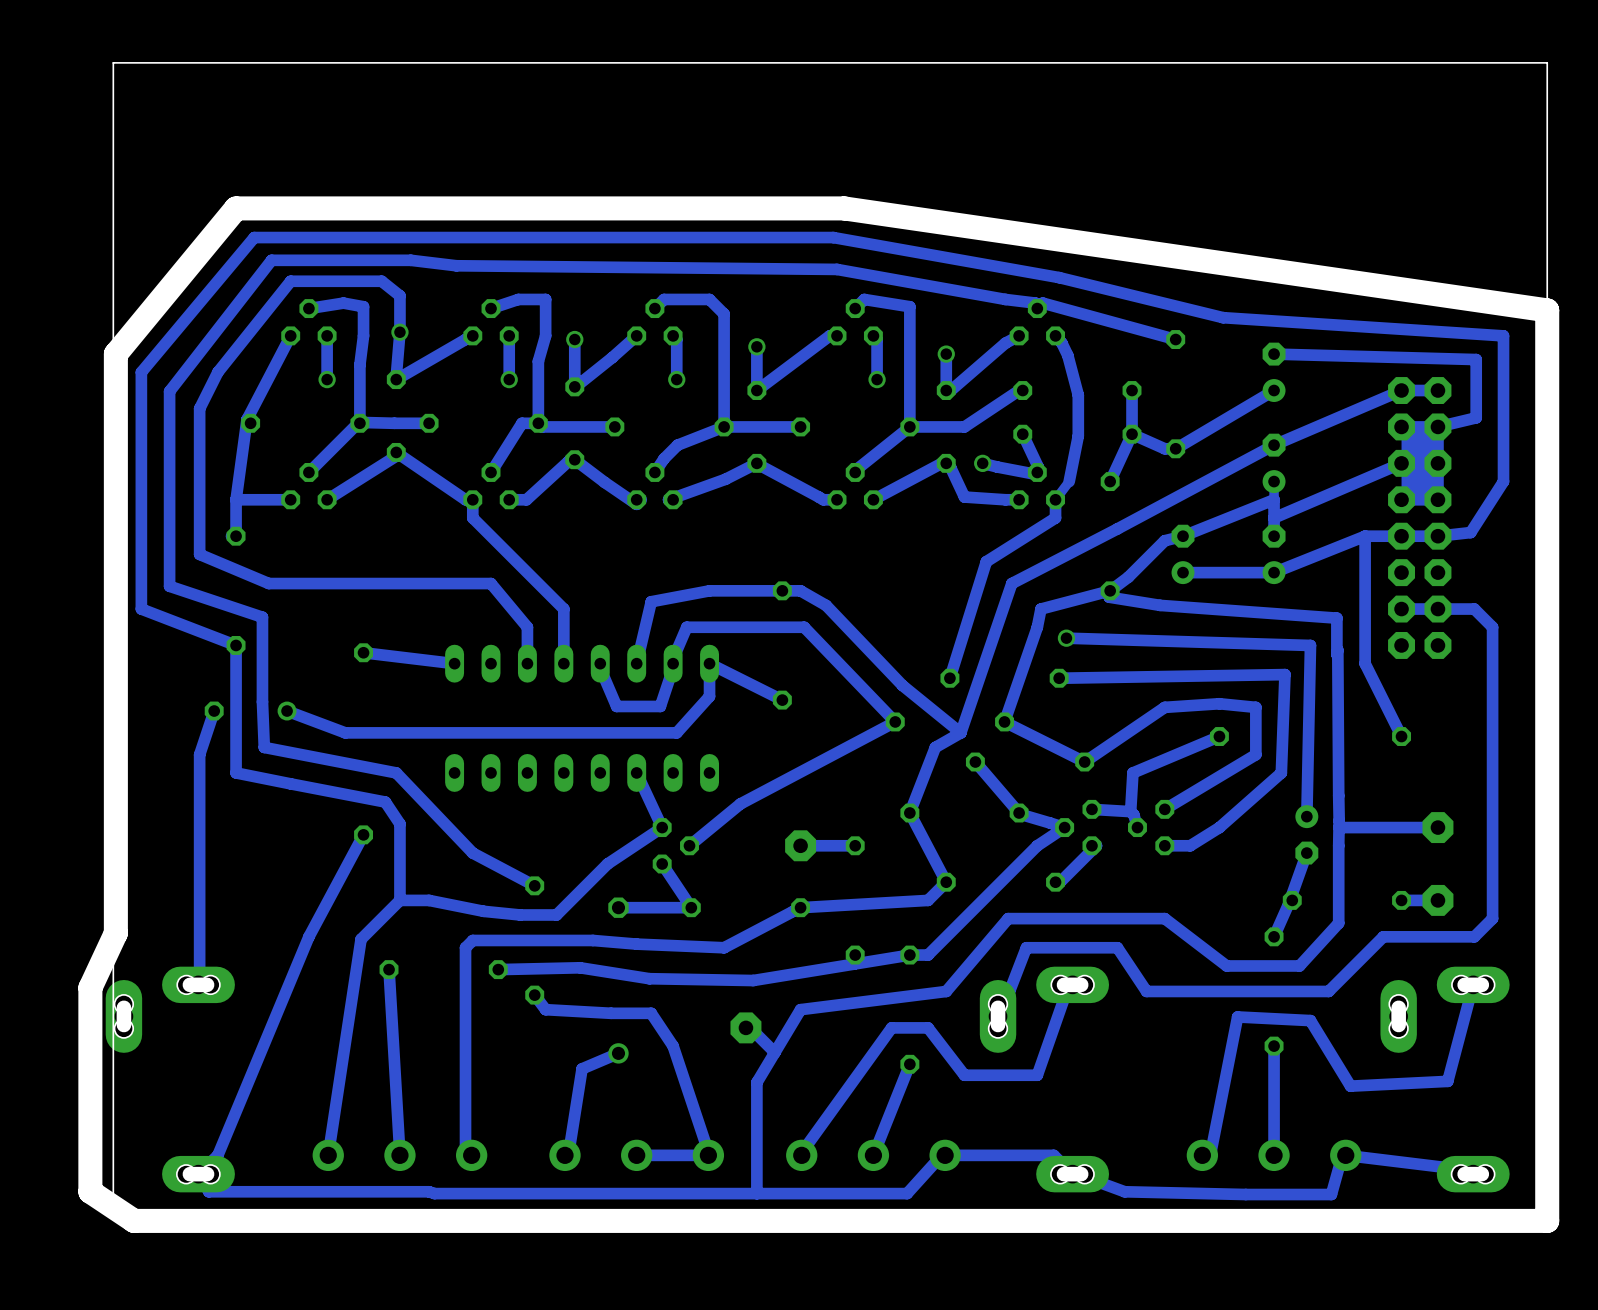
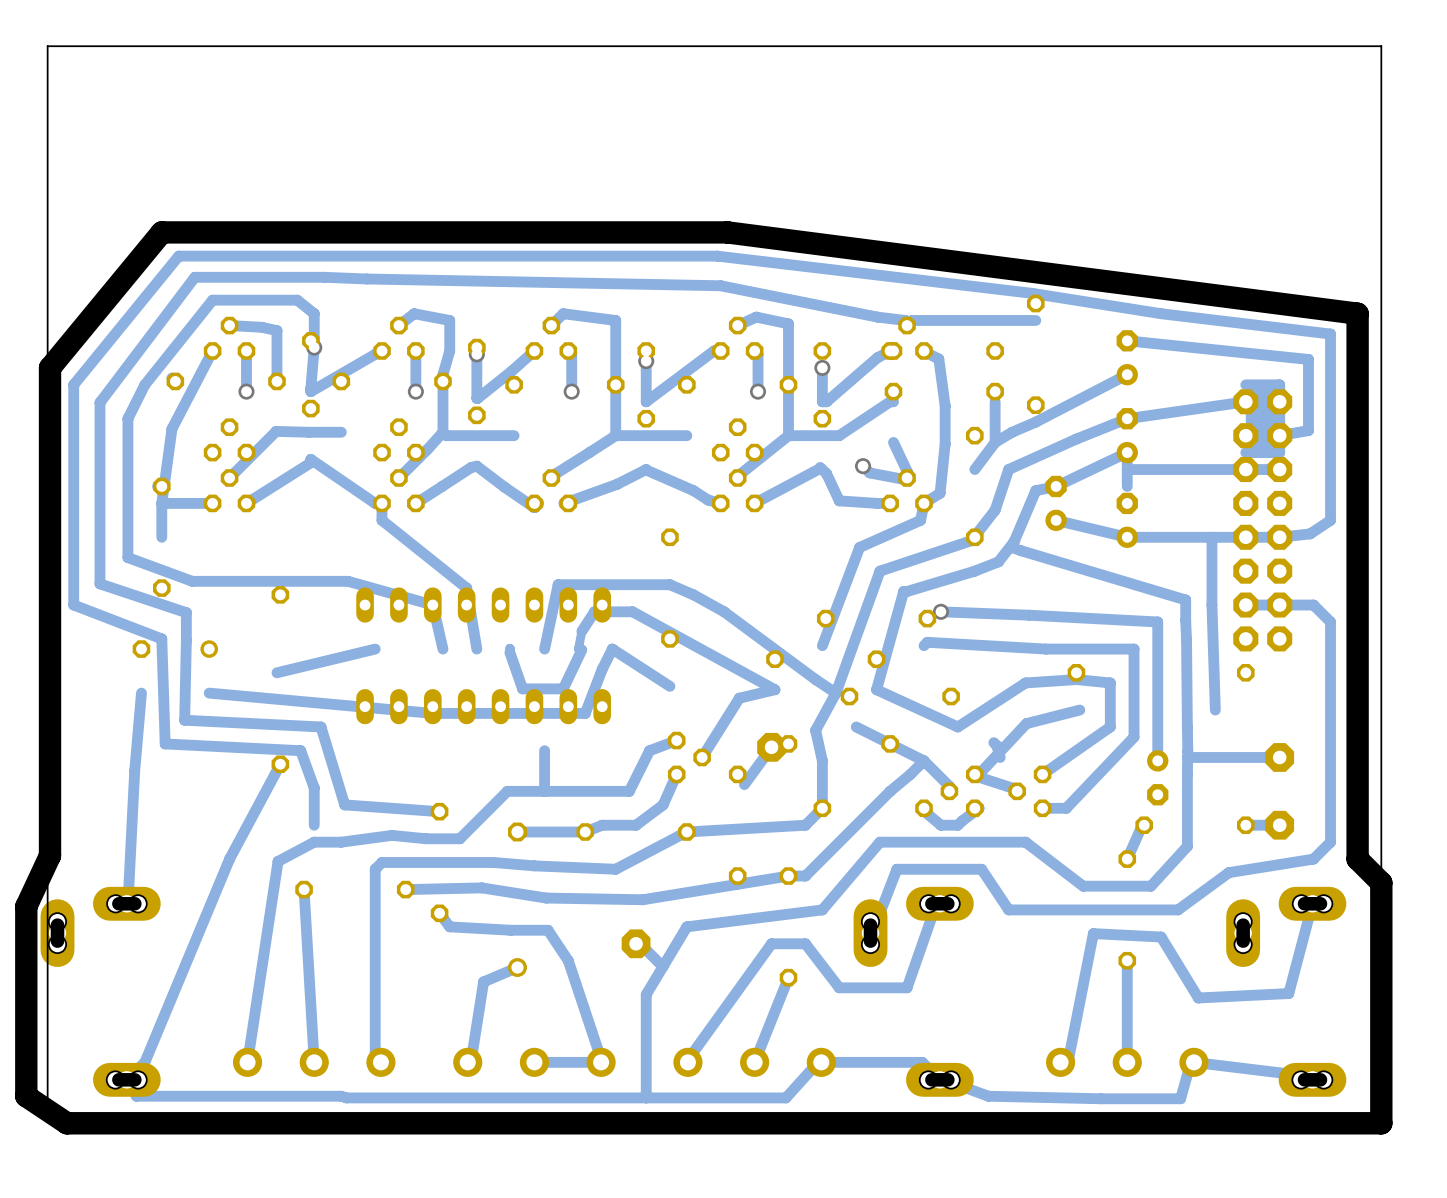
track: (308, 308) (343, 303) (363, 306) (363, 335) (359, 368) -> (229, 325) (261, 327) (276, 330)
track: (491, 308) (518, 299) (545, 299) (545, 335) (538, 361) (538, 416) -> (398, 325) (414, 313) (449, 320) (449, 350) (442, 374)
track: (654, 308) (664, 299) (709, 299) (724, 314) (724, 357) -> (551, 325) (563, 313) (615, 320)
track: (855, 308) (864, 299) (909, 306) (909, 361) -> (737, 325) (756, 317) (788, 323)
part position: (308, 322) -> (229, 338)
part position: (491, 322) -> (398, 338)
part: (654, 322) -> none
part position: (855, 322) -> (737, 338)
part: (1037, 322) -> none
via: (399, 332) -> none
track: (290, 335) (246, 419) (236, 499) -> (212, 350) (171, 428) (161, 503)
track: (327, 335) (327, 379) -> (246, 350) (246, 391)
track: (472, 335) (396, 379) (399, 332) (399, 295) (381, 281) (290, 281) (217, 372) (199, 408) (199, 463) -> (381, 350) (310, 391) (314, 313) (297, 300) (212, 300) (144, 384) (127, 418)
track: (509, 335) (509, 379) -> (415, 350) (415, 391)
track: (636, 335) (575, 386) (574, 339) -> (534, 350) (477, 398) (476, 354)
track: (673, 335) (676, 339) (676, 379) -> (568, 350) (571, 354) (571, 391)
track: (837, 335) (829, 335) (756, 390) (756, 346) -> (720, 350) (713, 350) (646, 401) (646, 361)
track: (873, 335) (877, 339) (877, 379) -> (754, 350) (758, 354) (758, 391)
track: (1019, 335) (1005, 343) (950, 390) (946, 390) (946, 354) -> (890, 350) (877, 357) (826, 401) (822, 401) (822, 367)
track: (1055, 335) (1061, 343) (1067, 355) (1078, 395) (1078, 436) (1069, 481) (1055, 499) (1055, 517) (986, 561) (949, 678) -> none
via: (574, 339) -> none
track: (1175, 339) (1042, 303) (1037, 308) (1035, 303) (837, 269) (456, 265) (410, 260) (271, 260) (169, 391) (169, 446) -> (1035, 320) (912, 320) (907, 325) (905, 320) (877, 317) (720, 285) (324, 277) (194, 277) (99, 402)
via: (756, 346) -> none
via: (946, 354) -> none
track: (1274, 354) (1476, 359) (1476, 417) (1437, 426) -> none
part position: (1274, 372) -> (1127, 357)
part: none -> (551, 338)
part: none -> (907, 338)
via: (327, 379) -> none
via: (509, 379) -> none
via: (676, 379) -> none
via: (877, 379) -> none
track: none -> (1127, 340) (1308, 359) (1308, 430) (1279, 435) (1245, 435)
via: none -> (314, 347)
track: (1022, 390) (1019, 390) (964, 426) (909, 426) (855, 472) -> none
track: none -> (924, 350) (938, 359) (945, 406) (945, 444) (940, 493) (924, 503) (920, 520) (859, 547) (822, 645)
track: (1132, 390) (1132, 434) -> (995, 401) (995, 442)
track: (1274, 390) (1175, 448) (1164, 448) (1132, 434) -> none
track: (1437, 390) (1401, 390) (1274, 445) (1011, 583) (960, 732) -> none
via: none -> (476, 354)
via: none -> (646, 361)
board edge: (115, 408) (115, 354) (236, 208) (844, 208) (1547, 310) (1547, 962) -> (50, 367) (161, 232) (727, 232) (1357, 313) (1357, 859) (1381, 882)
via: none -> (822, 367)
track: none -> (1127, 374) (995, 442)
track: (429, 423) (358, 422) (308, 472) -> (341, 432) (276, 431) (229, 478)
track: none -> (442, 381) (442, 432)
track: (141, 426) (141, 372) (254, 237) (833, 237) (1059, 277) (1223, 317) (1503, 335) (1503, 481) (1470, 532) (1437, 536) (1365, 536) -> (73, 384) (178, 256) (717, 256) (1032, 293) (1161, 313) (1330, 334) (1330, 520) (1310, 533) (1279, 537) (1127, 537) (1056, 520)
track: (614, 426) (542, 426) (538, 423) (521, 423) (491, 472) -> none
track: none -> (615, 384) (615, 435)
track: (800, 426) (724, 426) (677, 445) (664, 458) (654, 472) -> none
track: none -> (788, 384) (788, 435)
via: none -> (246, 391)
via: none -> (415, 391)
via: none -> (571, 391)
via: none -> (758, 391)
track: (1022, 434) (1038, 467) (1037, 474) -> (893, 442) (907, 472) (907, 480)
track: (1132, 434) (1110, 481) -> none
track: none -> (893, 401) (890, 401) (839, 435) (788, 435)
track: none -> (1279, 401) (1245, 401) (1127, 418) (1008, 469) (995, 510) (971, 540) (879, 571) (835, 693)
track: (982, 463) (1037, 474) -> none
via: (982, 463) -> none
part position: (1274, 463) -> (1127, 435)
track: (1437, 463) (1401, 463) (1274, 517) -> (1279, 469) (1127, 469)
track: (950, 467) (964, 497) (1019, 499) -> (826, 473) (839, 500) (890, 503)
track: (950, 467) (943, 461) (873, 499) -> (826, 473) (820, 467) (754, 503)
track: none -> (442, 432) (446, 435) (514, 435)
track: none -> (442, 432) (398, 478)
track: none -> (615, 435) (551, 478)
track: none -> (686, 435) (615, 435)
track: none -> (788, 435) (737, 478)
track: (1274, 481) (1274, 499) (1183, 536) (1164, 540) (1128, 577) (1110, 590) -> none
part: (654, 486) -> none
part: (1037, 486) -> none
track: none -> (995, 442) (974, 469)
track: (236, 499) (236, 536) -> (161, 503) (161, 537)
track: (290, 499) (236, 499) -> (212, 503) (161, 503)
track: (327, 499) (396, 456) (396, 452) (465, 499) (472, 499) (472, 517) (563, 609) (563, 663) -> none
track: (636, 499) (641, 499) (636, 504) (574, 459) (568, 461) (526, 499) (509, 499) -> none
track: (837, 499) (823, 499) (756, 463) (725, 479) (668, 499) (673, 499) -> none
track: none -> (1127, 452) (1056, 486) (1035, 490) (1014, 541)
track: none -> (863, 466) (869, 472) (907, 480)
via: none -> (863, 466)
part position: (1419, 517) -> (1262, 520)
track: (1365, 536) (1365, 590) -> none
track: (1365, 536) (1274, 572) (1183, 572) -> none
part: none -> (229, 490)
part: none -> (398, 490)
part: none -> (551, 490)
part: none -> (737, 490)
part: none -> (907, 490)
track: (199, 554) (268, 583) (491, 583) (527, 627) (527, 663) -> (127, 503) (127, 557) (192, 581) (348, 581) (432, 605) (442, 649)
track: none -> (246, 503) (310, 462) (310, 459) (375, 503) (381, 503) (381, 520) (466, 588) (476, 649)
track: none -> (534, 503) (538, 503) (534, 507) (476, 466) (471, 467) (415, 503)
track: none -> (720, 503) (708, 500) (693, 490) (646, 469) (617, 484) (564, 503) (568, 503)
part position: (1183, 554) -> (1056, 503)
part position: (1274, 554) -> (1127, 520)
track: (169, 586) (262, 617) (262, 671) -> (99, 533) (99, 583) (186, 612)
track: (1110, 590) (1109, 597) (1160, 605) (1336, 618) (1338, 795) -> (1014, 541) (1011, 547) (1021, 550) (1185, 599) (1187, 727)
track: (1110, 590) (1040, 609) (1037, 627) (1004, 721) (1084, 762) (1164, 707) (1219, 703) (1255, 707) (1255, 747) -> (1014, 541) (998, 561) (974, 571) (903, 591) (876, 689) (957, 726) (1025, 682) (1076, 679) (1110, 682)
track: (141, 609) (236, 645) (236, 772) (385, 802) (399, 823) (399, 860) -> (73, 554) (73, 605) (161, 638) (165, 743) (300, 750) (314, 787)
track: (1437, 609) (1401, 609) (1474, 609) (1492, 627) (1492, 681) -> (1279, 605) (1245, 605) (1313, 605) (1330, 621)
track: (1066, 638) (1310, 645) (1306, 816) -> none
via position: (1066, 638) -> (940, 611)
track: (363, 652) (454, 663) -> none
track: (600, 663) (616, 706) (660, 706) (673, 668) (673, 659) (686, 627) (804, 627) (895, 721) (740, 803) (689, 845) -> none
track: (636, 663) (651, 601) (709, 590) (800, 590) (826, 605) (902, 685) (960, 732) -> none
track: (1365, 663) (1401, 736) -> (1211, 605) (1215, 710)
track: none -> (940, 611) (1157, 621) (1157, 760)
track: (1059, 678) (1284, 674) (1281, 772) (1219, 827) (1190, 845) (1164, 845) -> none
track: (782, 700) (709, 663) (709, 696) (676, 732) (345, 732) (287, 711) -> none
track: (262, 701) (264, 747) (396, 772) (472, 853) (534, 885) -> (186, 640) (184, 720) (321, 726) (344, 804) (439, 811)
track: none -> (924, 645) (927, 642) (1045, 649) (1134, 649) (1134, 737) (1066, 808) (1042, 808)
track: (214, 711) (199, 754) (199, 986) -> (141, 693) (134, 771) (127, 904)
track: none -> (375, 649) (276, 672)
track: none -> (510, 649) (509, 652) (522, 688) (563, 688) (581, 649) (578, 649) (581, 631) (594, 611) (632, 611) (774, 689) (739, 698) (702, 757)
track: none -> (544, 649) (558, 584) (669, 584) (693, 594) (724, 611) (835, 693)
track: (960, 732) (935, 747) (909, 813) (946, 882) -> (835, 693) (815, 730) (822, 760) (822, 808)
track: (1219, 736) (1132, 772) (1130, 811) (1091, 809) -> none
track: none -> (669, 686) (612, 649) (585, 713) (432, 713) (209, 693)
track: (1255, 754) (1164, 809) -> (1110, 689) (1110, 726) (1042, 774)
track: (975, 762) (1019, 813) (1064, 827) (1037, 845) (1019, 863) -> (924, 760) (890, 791)
track: (636, 772) (662, 827) (607, 863) -> (676, 740) (649, 750) (629, 791) (507, 791)
track: none -> (1079, 710) (1026, 723) (976, 776)
track: none -> (856, 726) (924, 760)
track: none -> (771, 747) (744, 784)
track: none -> (544, 750) (544, 791)
part: (1078, 827) -> none
part: (1151, 827) -> none
track: none -> (924, 760) (949, 786) (949, 791)
part position: (1306, 834) -> (1157, 777)
part position: (675, 845) -> (689, 757)
part position: (800, 845) -> (771, 747)
track: (855, 845) (800, 845) -> none
track: (1091, 845) (1096, 845) (1060, 882) (1055, 882) -> (974, 808) (979, 808) (957, 825) (940, 825) (924, 811) (924, 808)
track: none -> (976, 776) (1017, 789) (1017, 791)
track: (1306, 853) (1288, 904) (1292, 900) -> none
track: (662, 863) (691, 907) -> (676, 774) (663, 804) (636, 825) (602, 825) (585, 832)
part: none -> (962, 791)
part: none -> (1029, 791)
track: (483, 911) (429, 900) (399, 900) (361, 939) -> (392, 835) (341, 842) (314, 842) (278, 861)
track: (1474, 936) (1383, 936) (1328, 991) -> (1313, 859) (1228, 872) (1178, 909)

